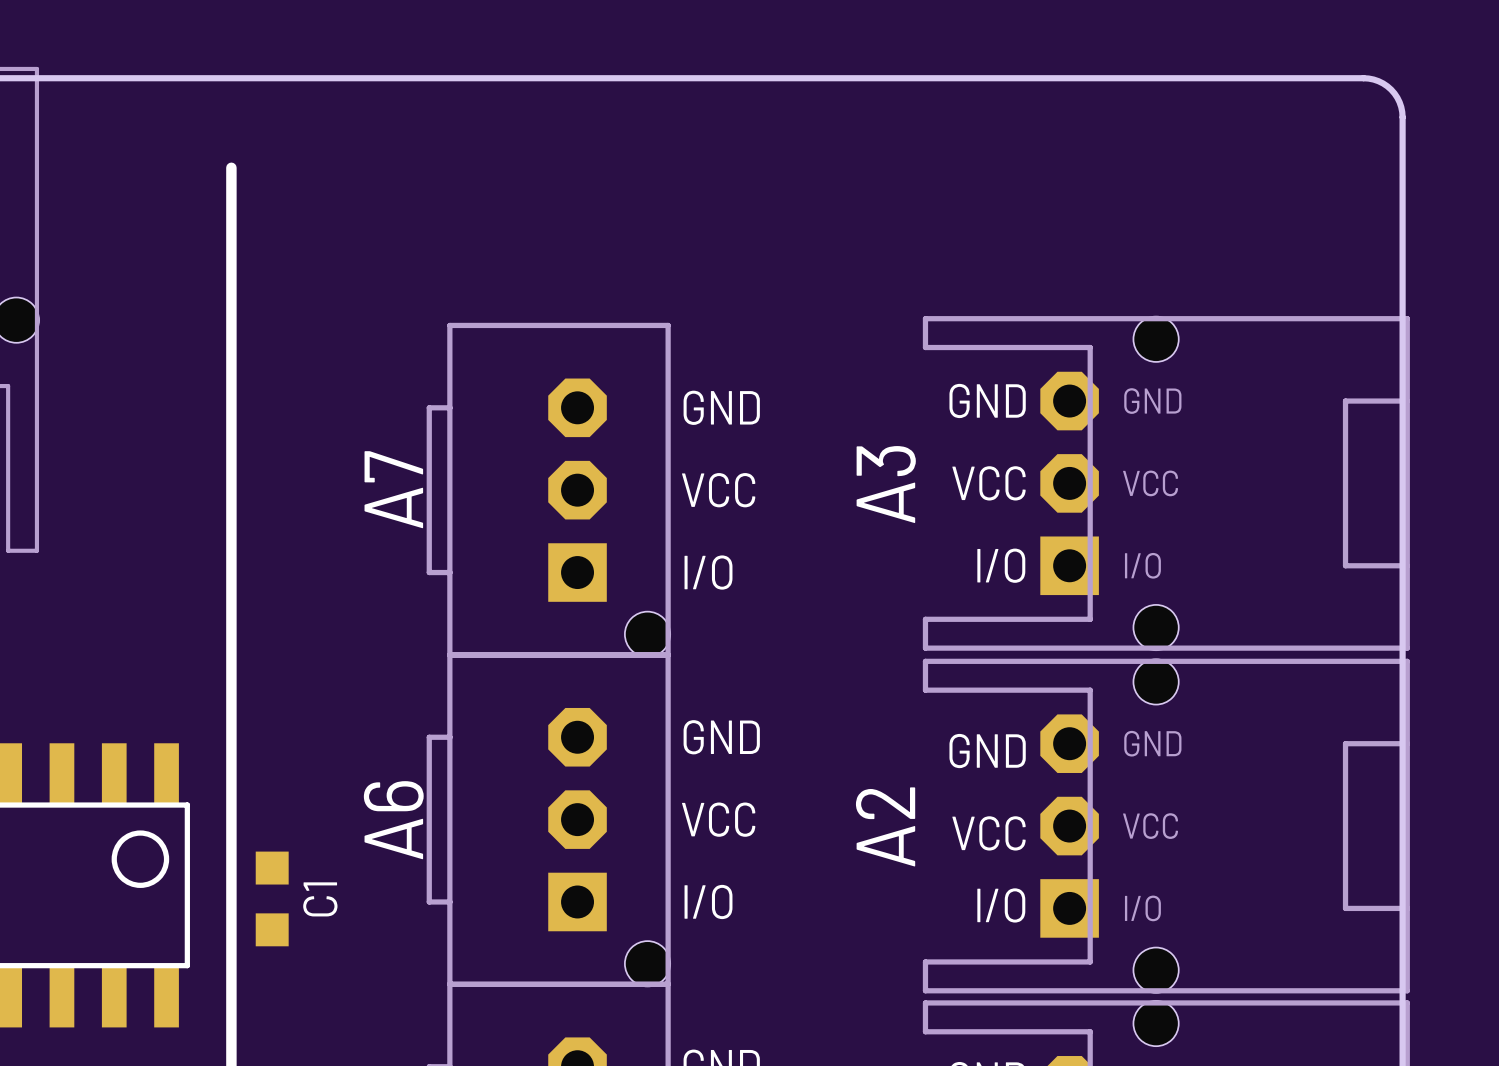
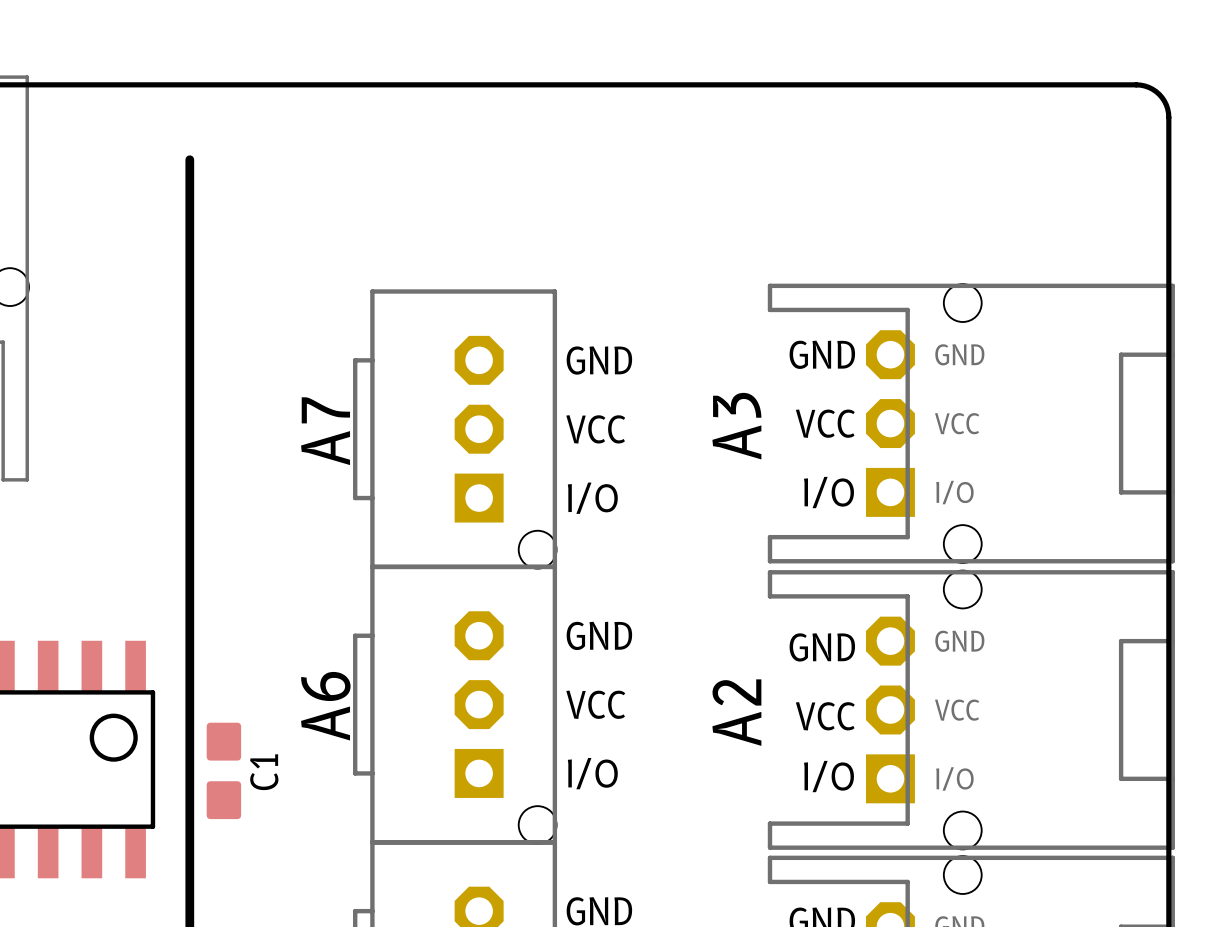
C1 footprint: [255, 851, 289, 947] -> [206, 722, 242, 820]

